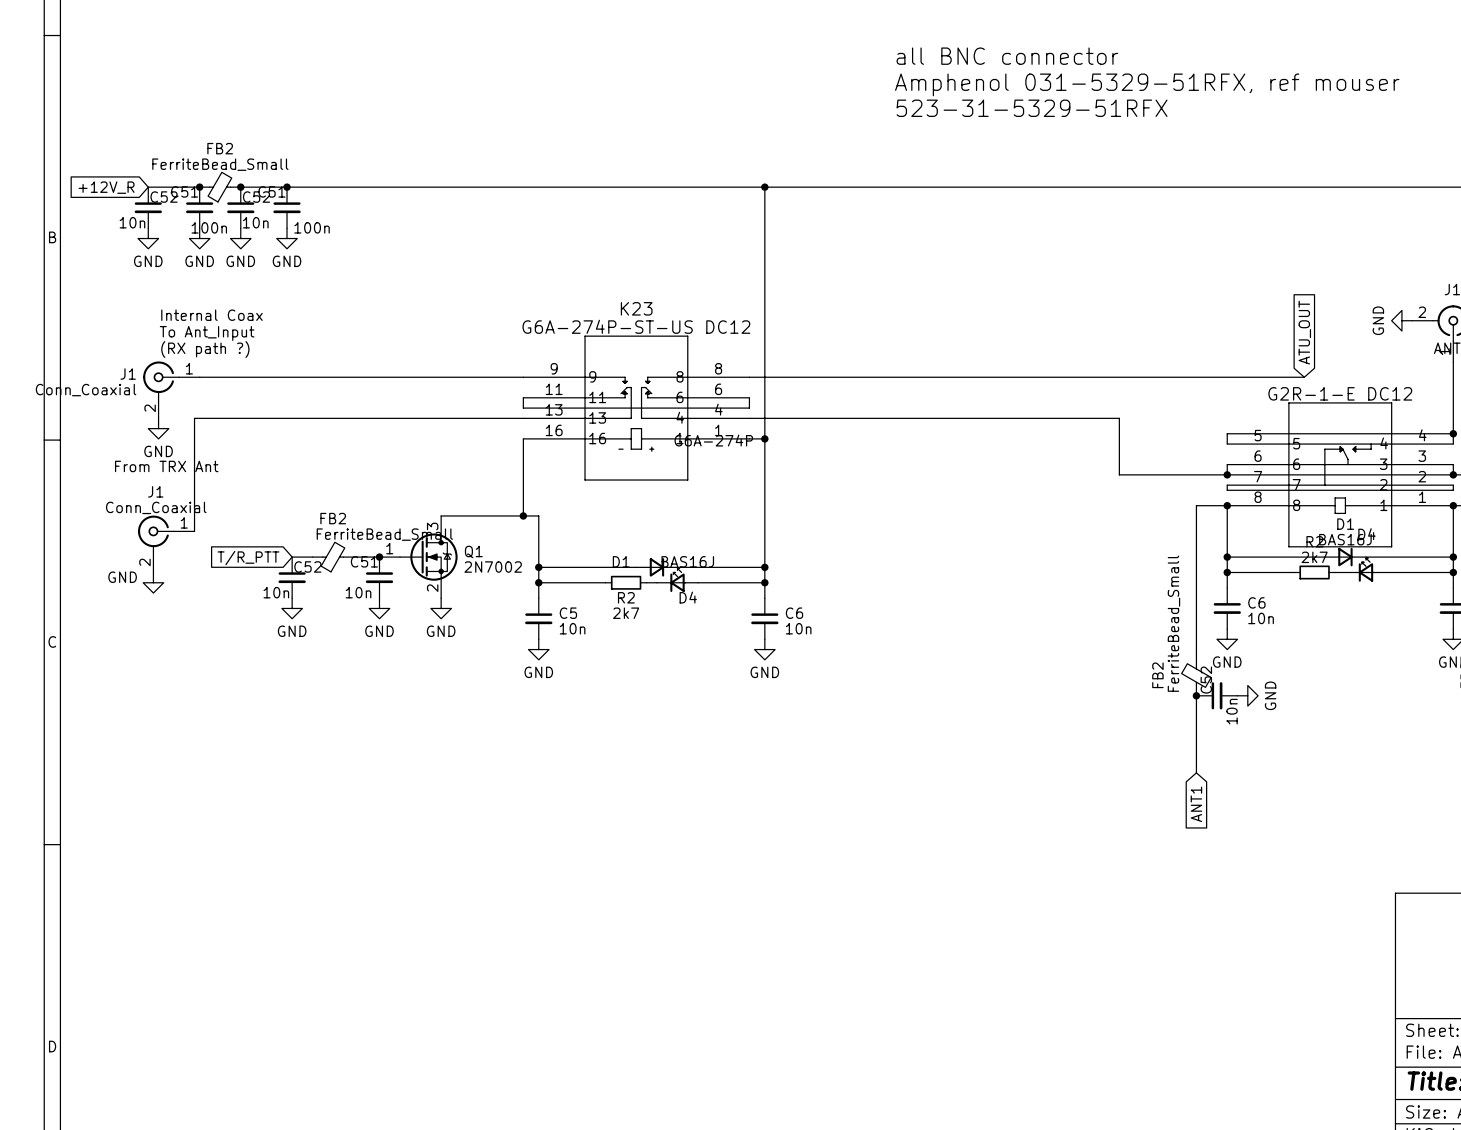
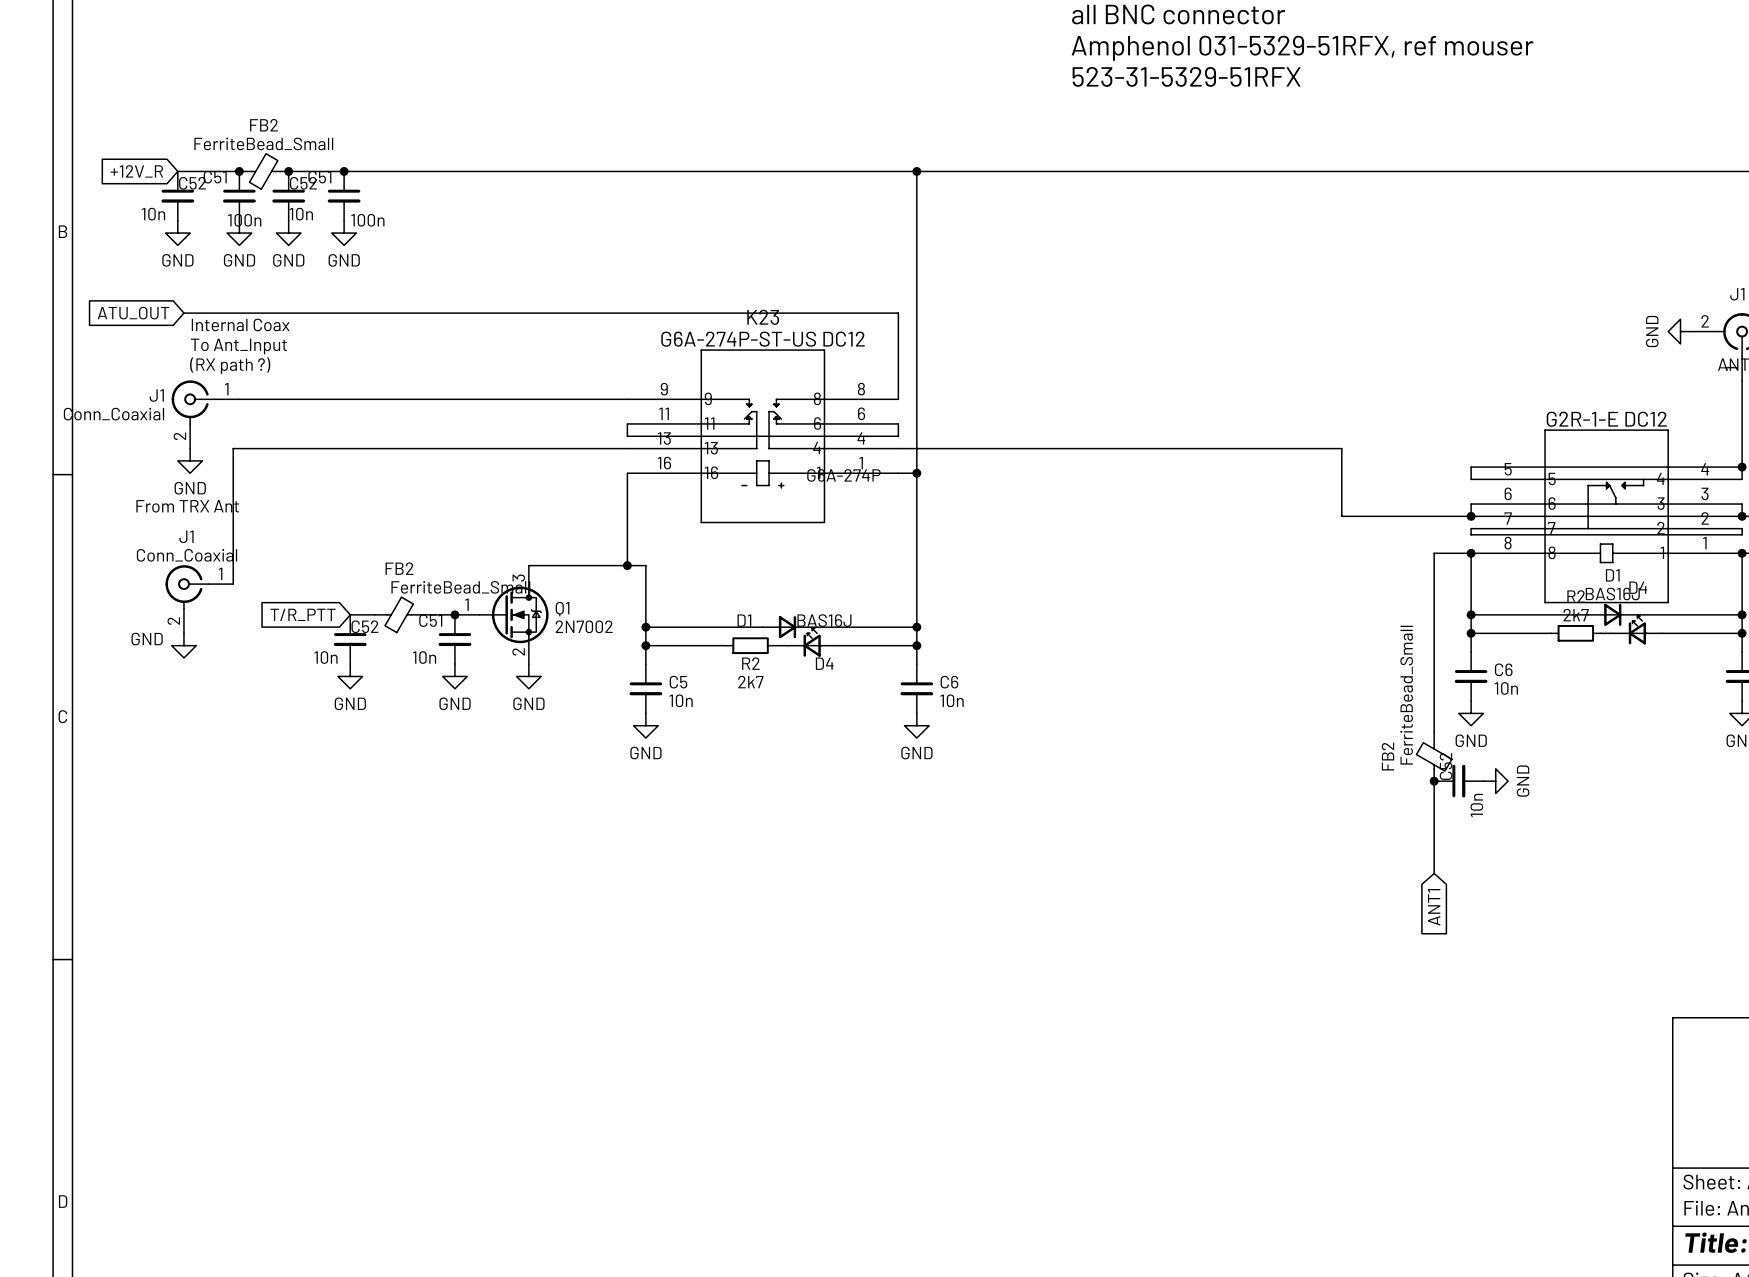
global label: none -> ATU_OUT (133, 313)
global label: ATU_OUT (1304, 332) -> none
wire: (749, 377) (1304, 377) -> (898, 399) (898, 313) (183, 313)

